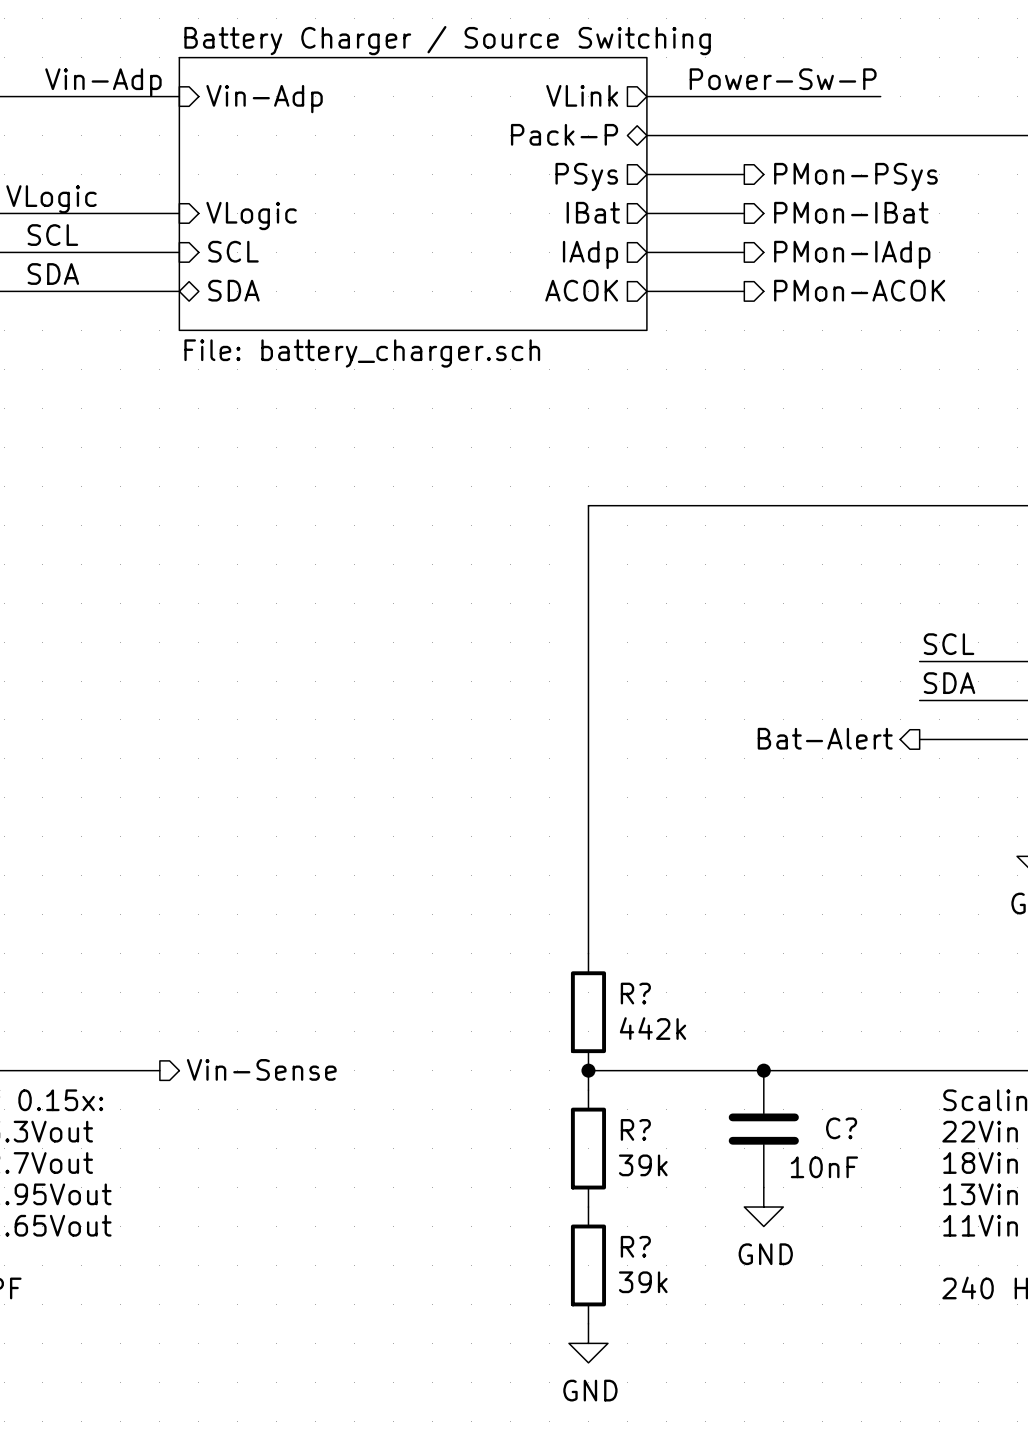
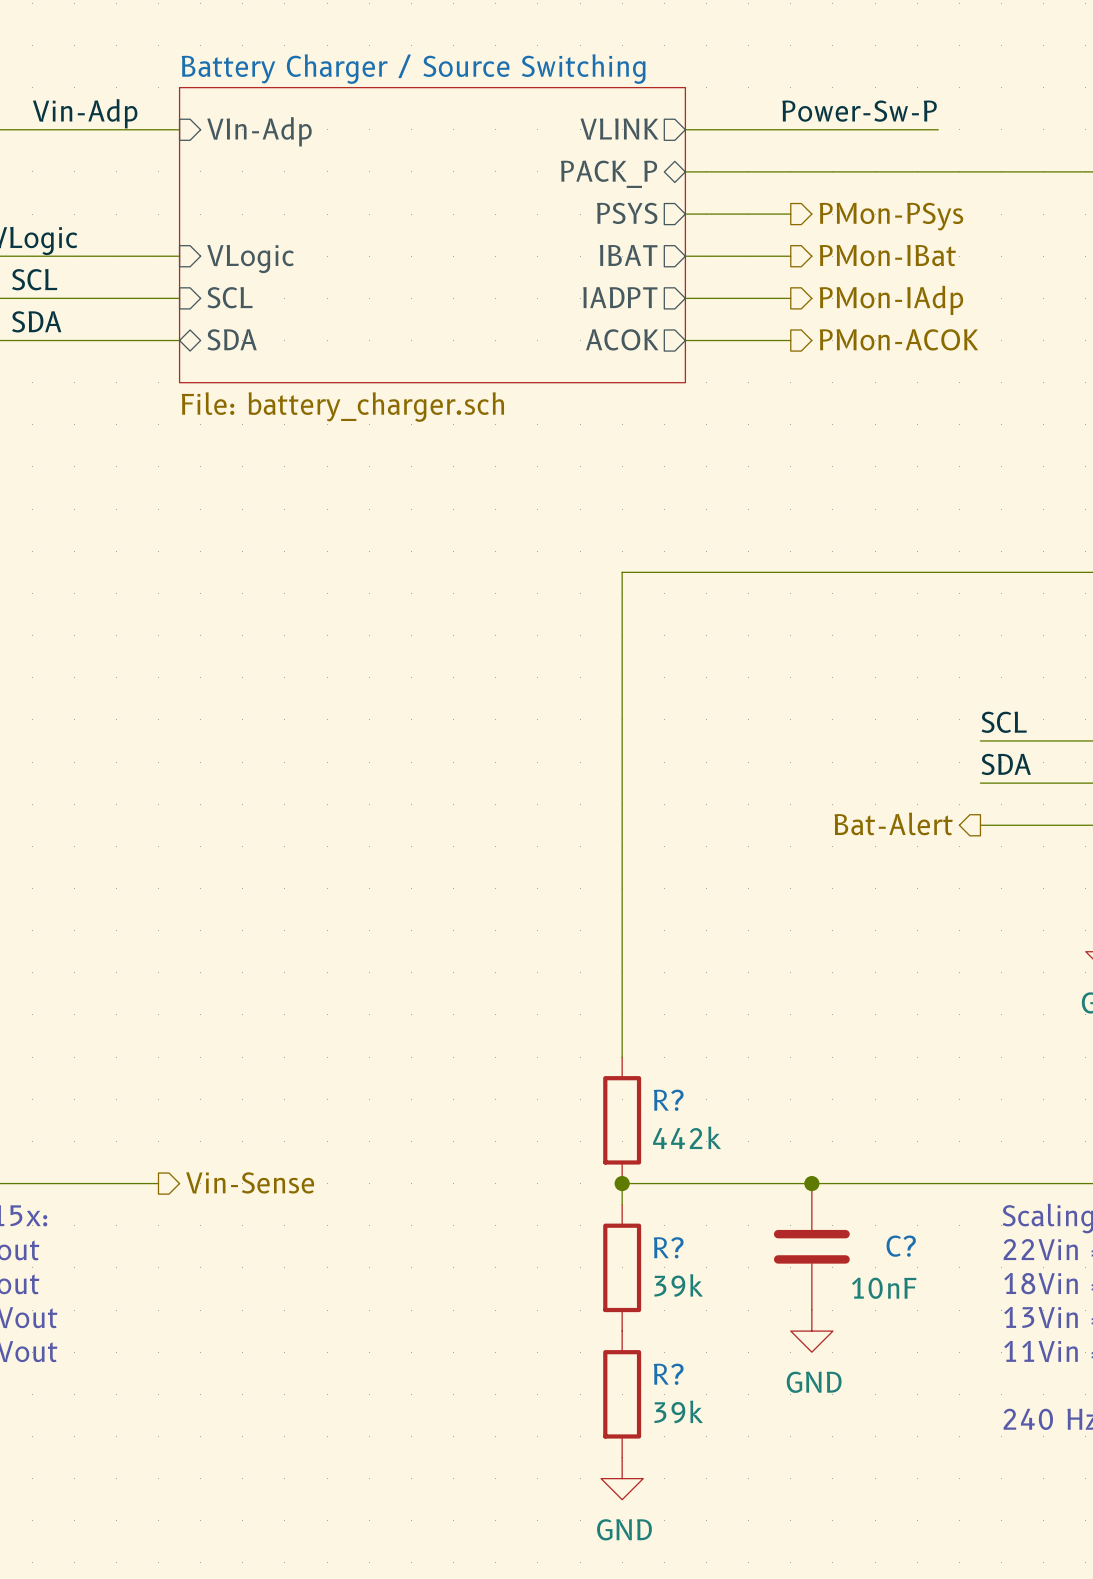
sheet pin: VLink (582, 95) -> VLINK (619, 129)
sheet pin: Vin-Adp (264, 99) -> VIn-Adp (259, 131)
sheet pin: Pack-P (564, 134) -> PACK_P (609, 174)
sheet pin: PSys (586, 177) -> PSYS (627, 213)
sheet pin: IBat (593, 212) -> IBAT (628, 255)
sheet pin: IAdp (590, 254) -> IADPT (620, 297)

